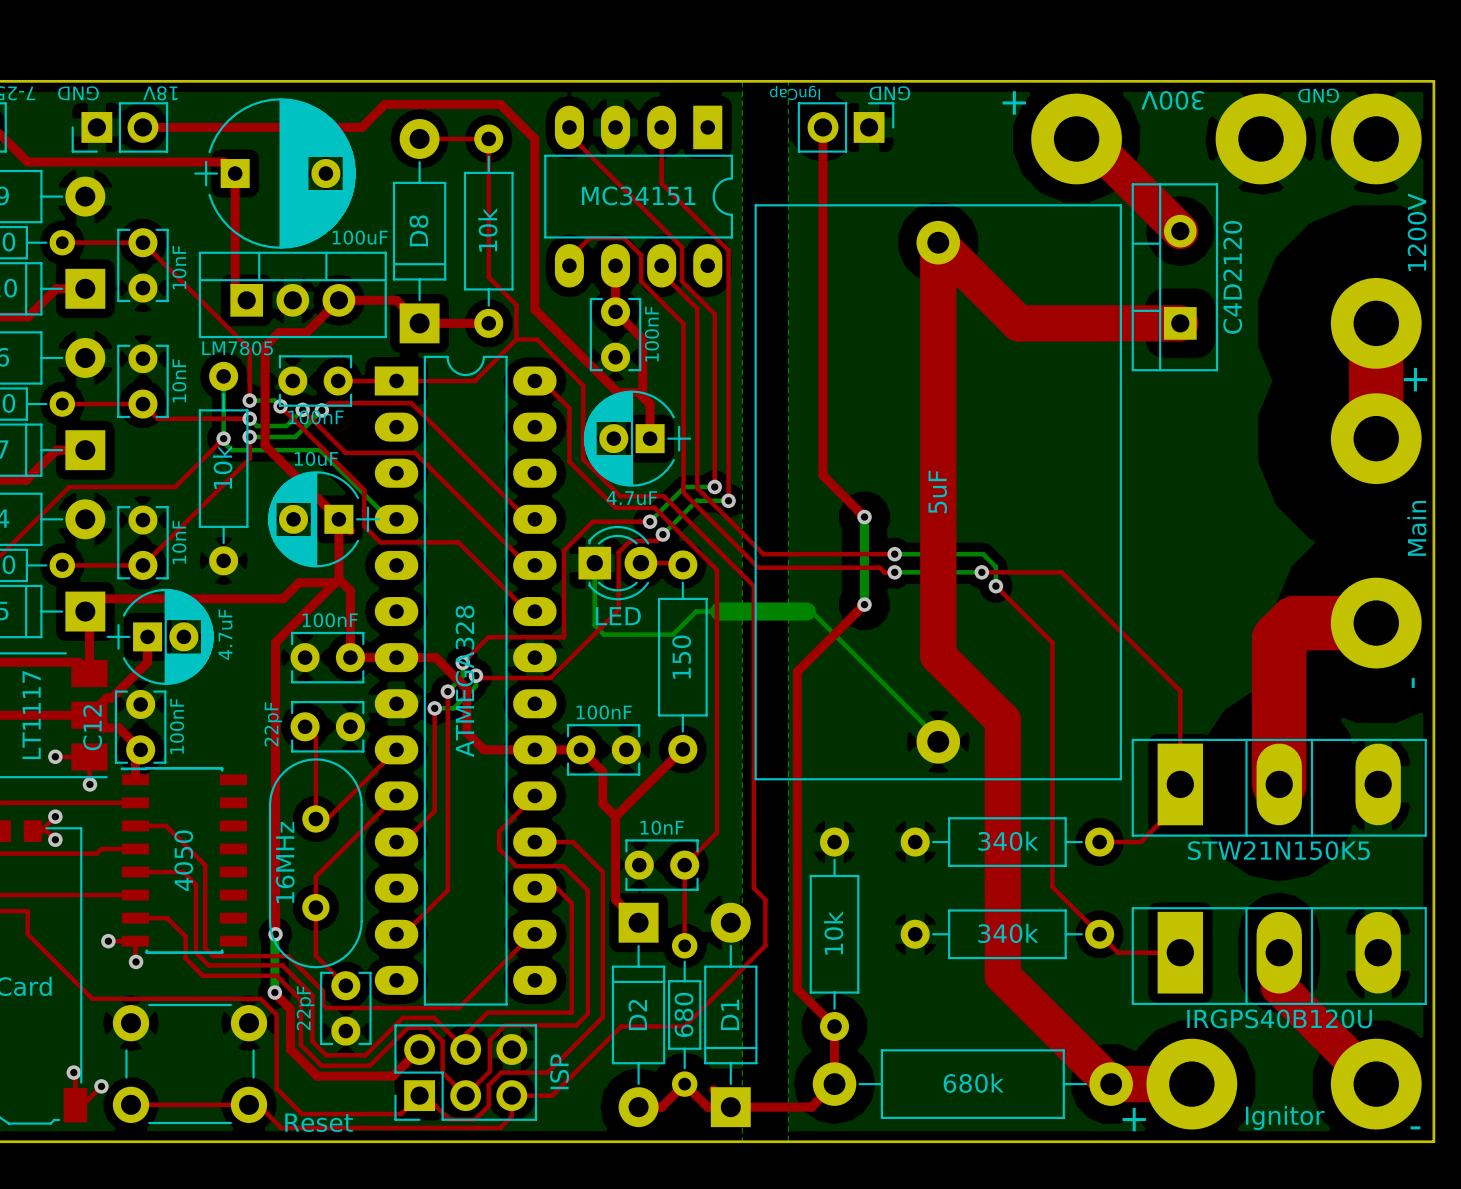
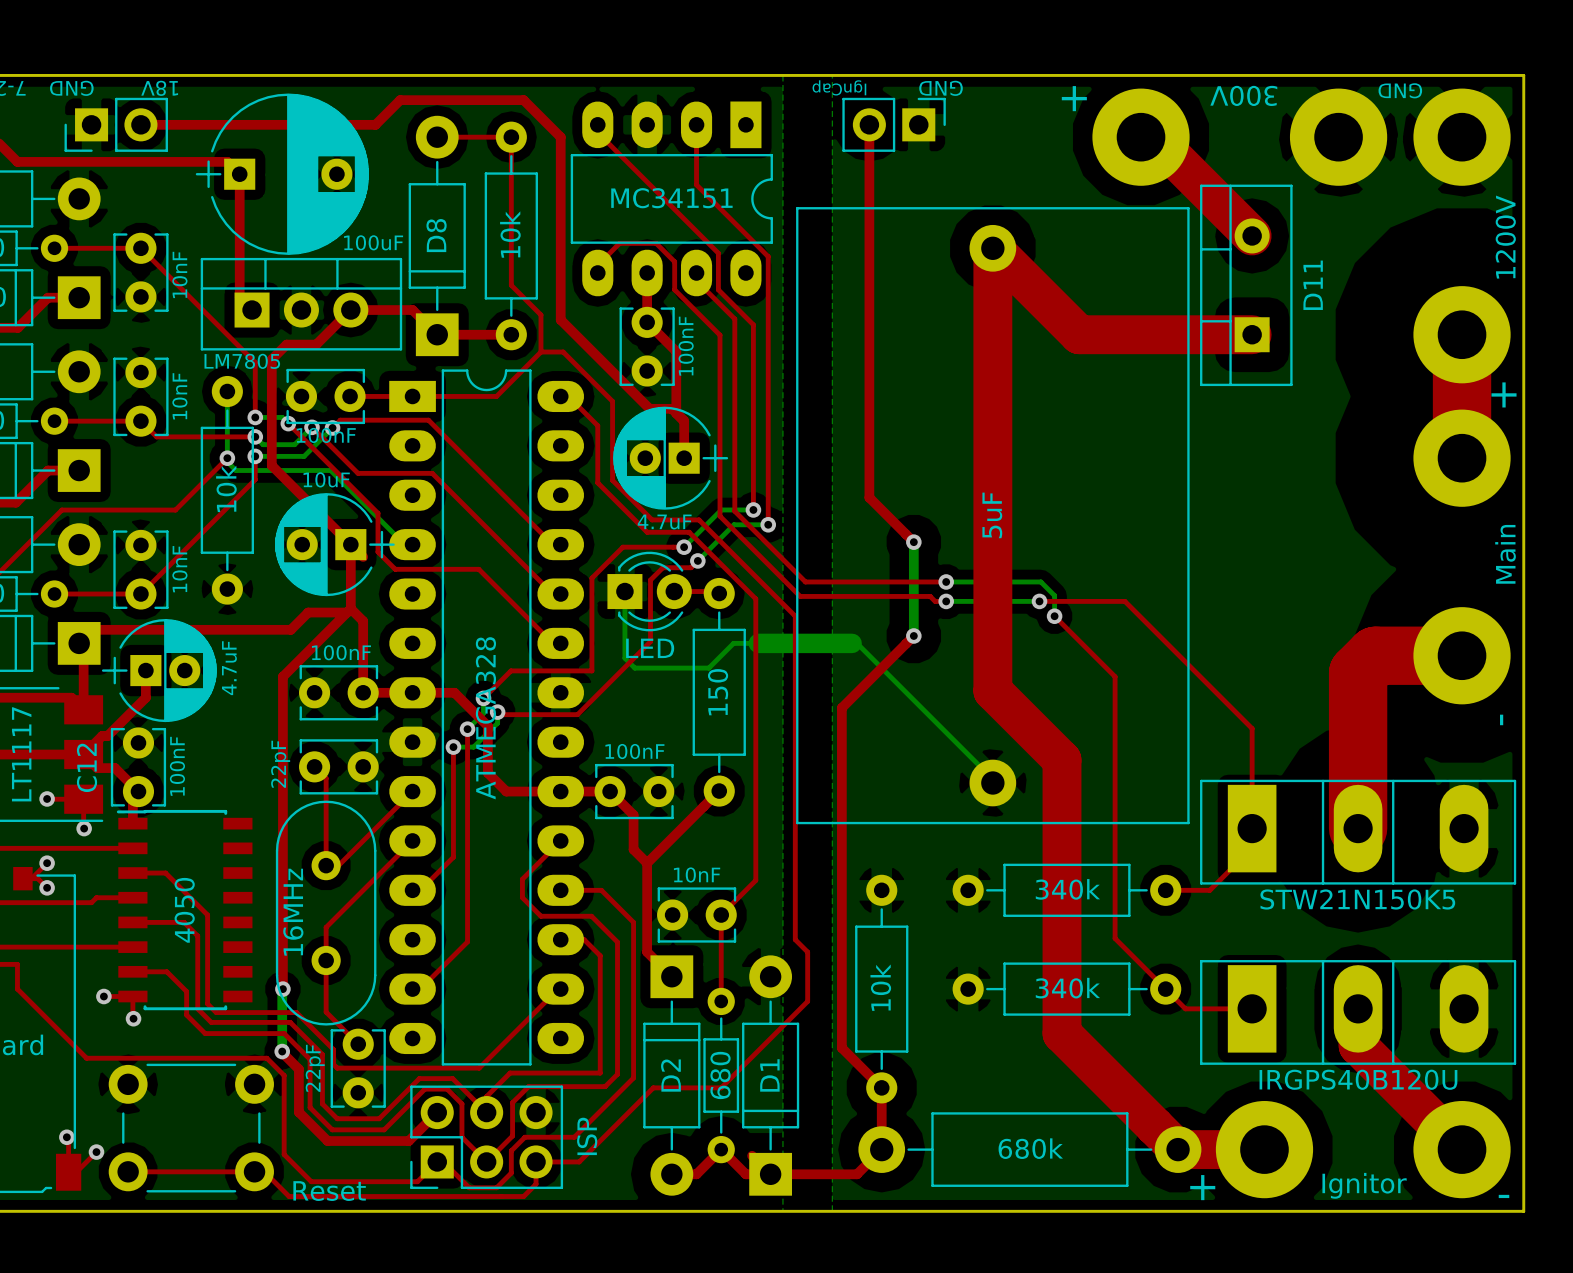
D11 value: C4D2120 (1232, 277) -> none
D11 name: none -> D11 (1313, 285)

